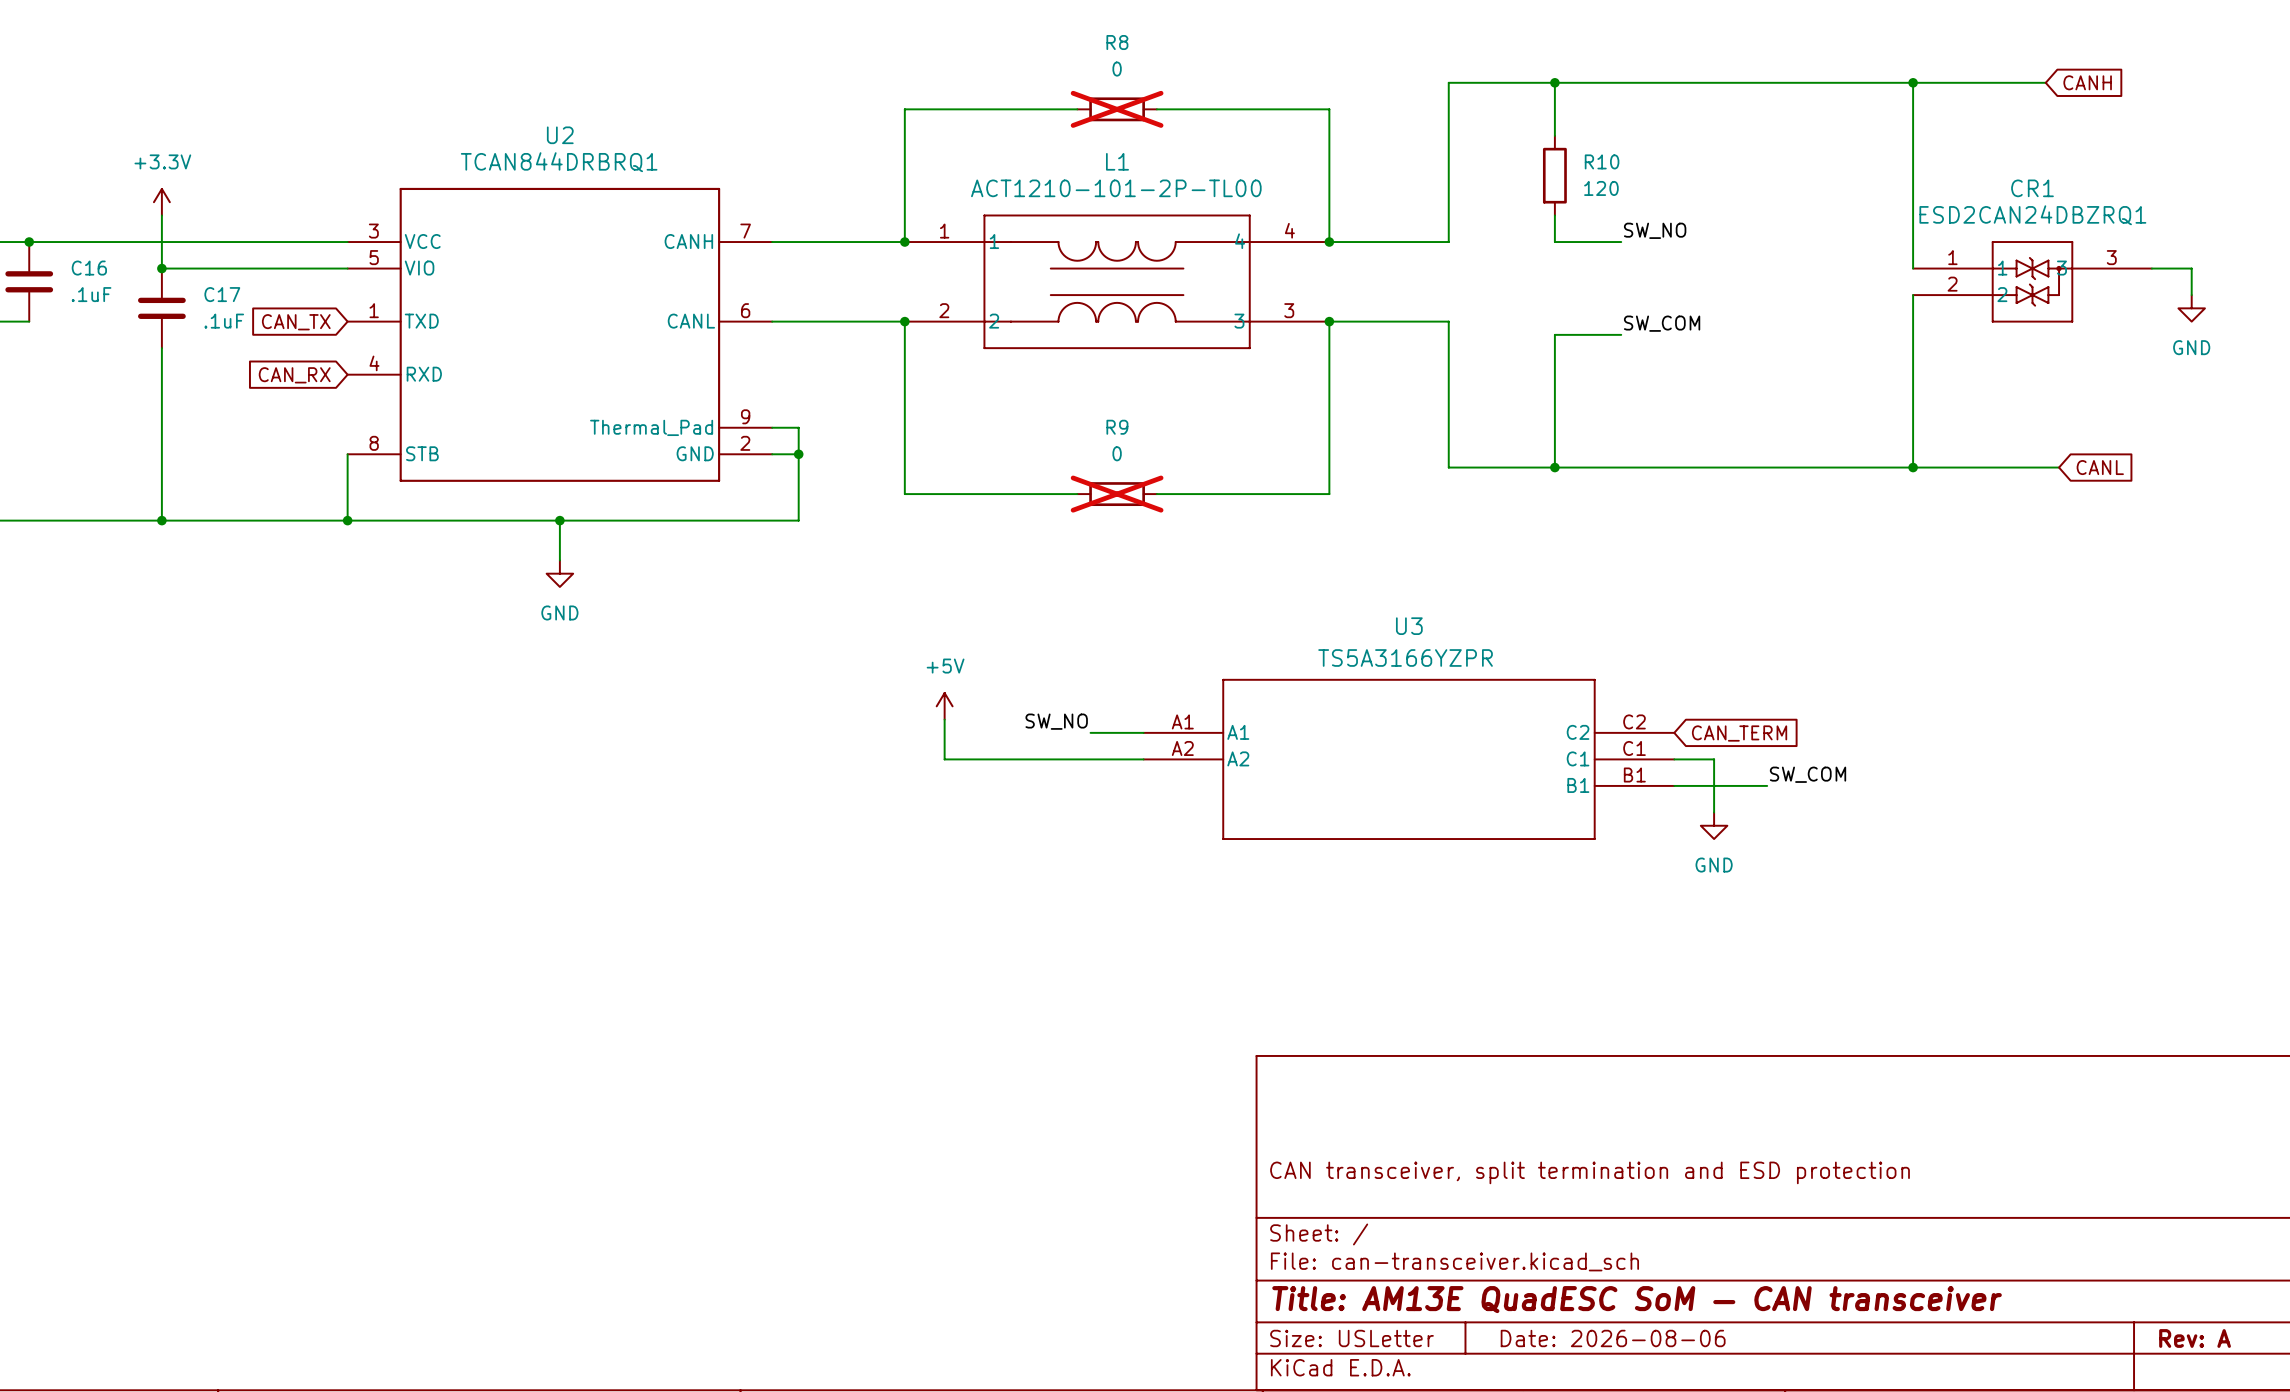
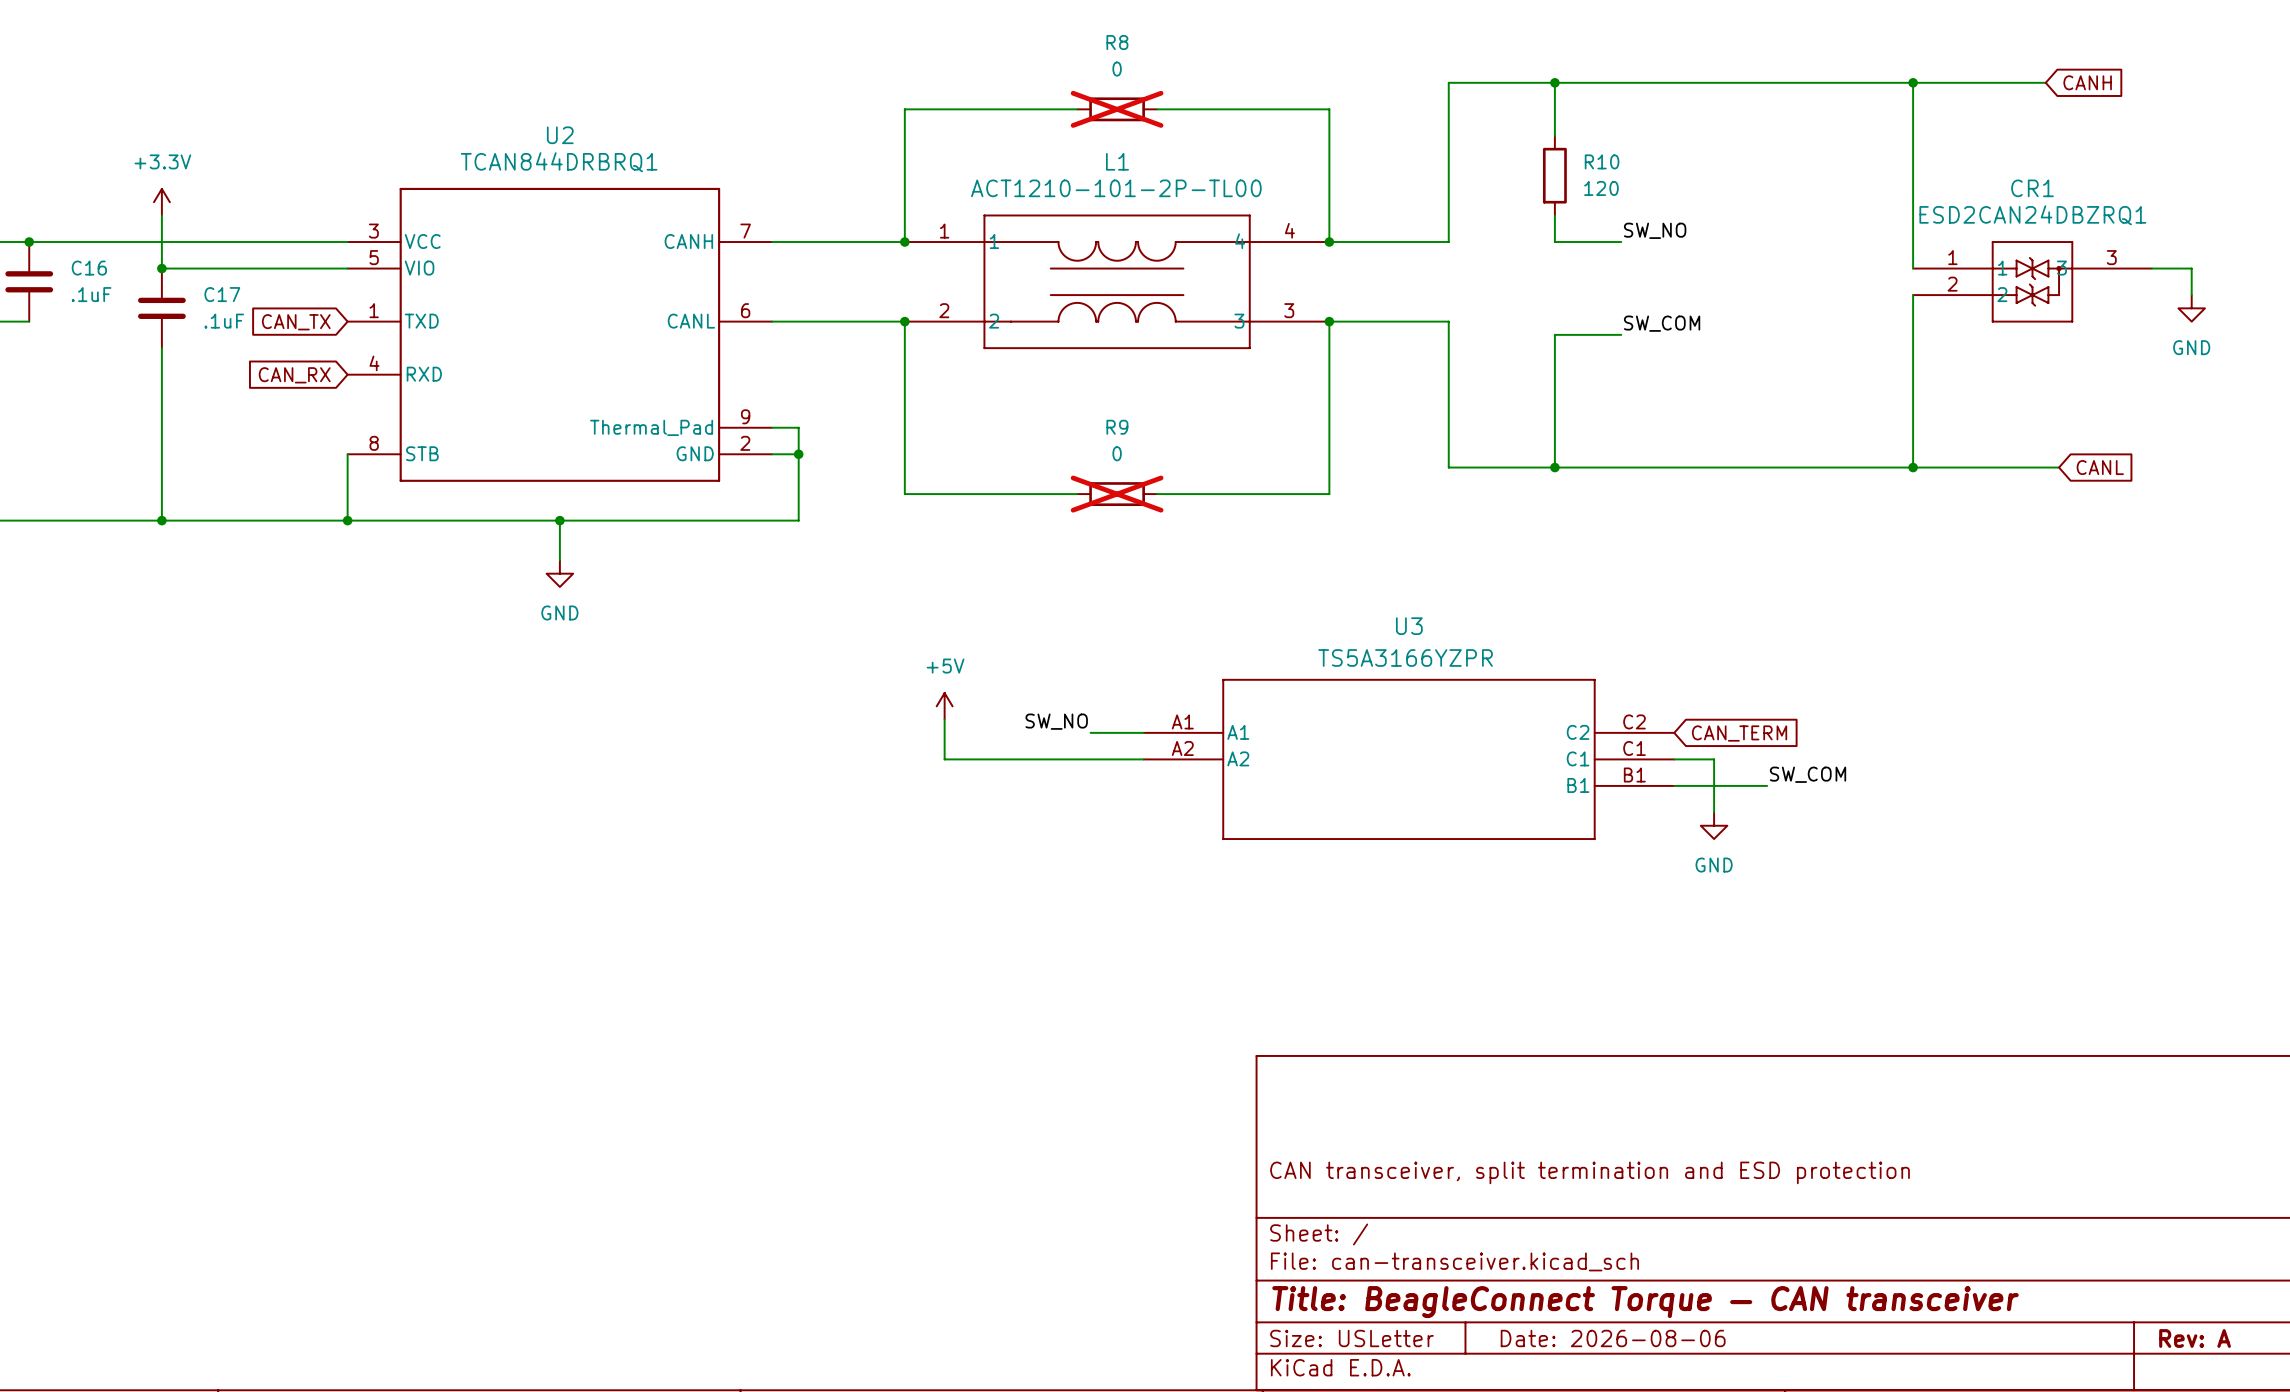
title block: Title: AM13E QuadESC SoM — CAN transceiver (1637, 1299) -> Title: BeagleConnect Torque — CAN transceiver (1645, 1302)

